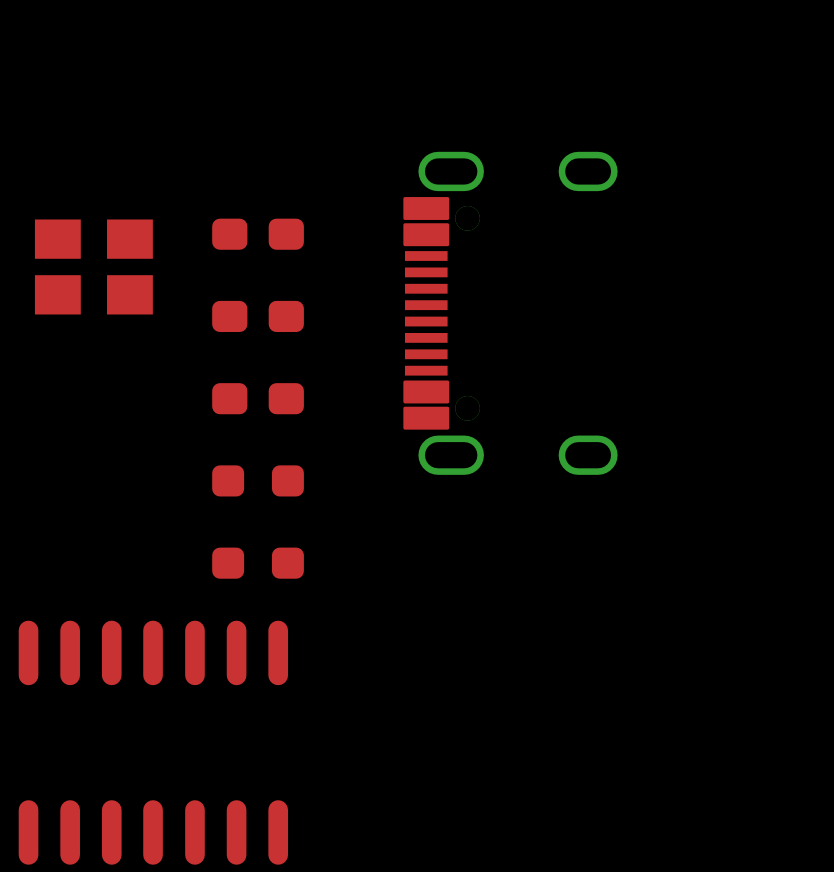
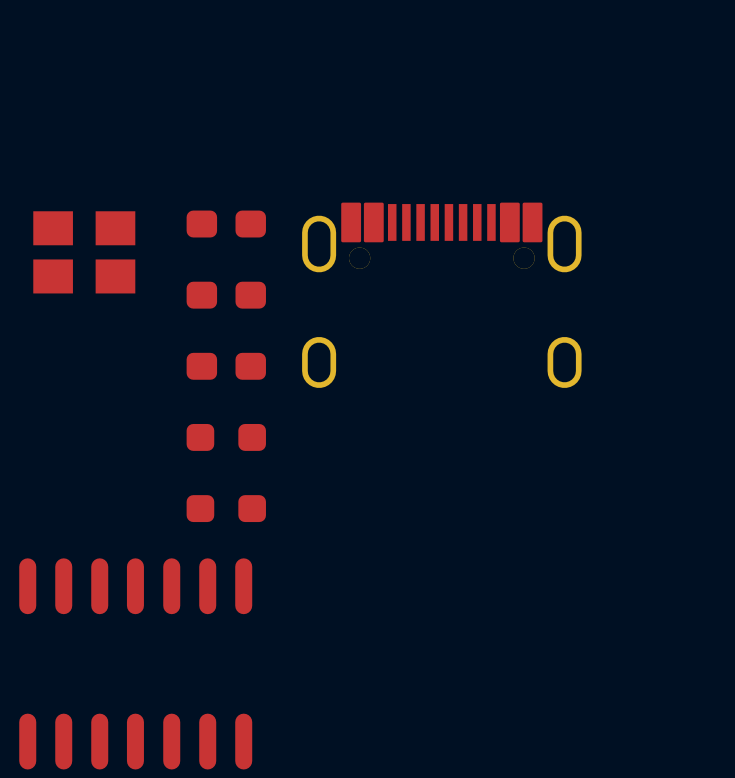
part rotation: 0° (510, 313) -> 90° clockwise (441, 295)

